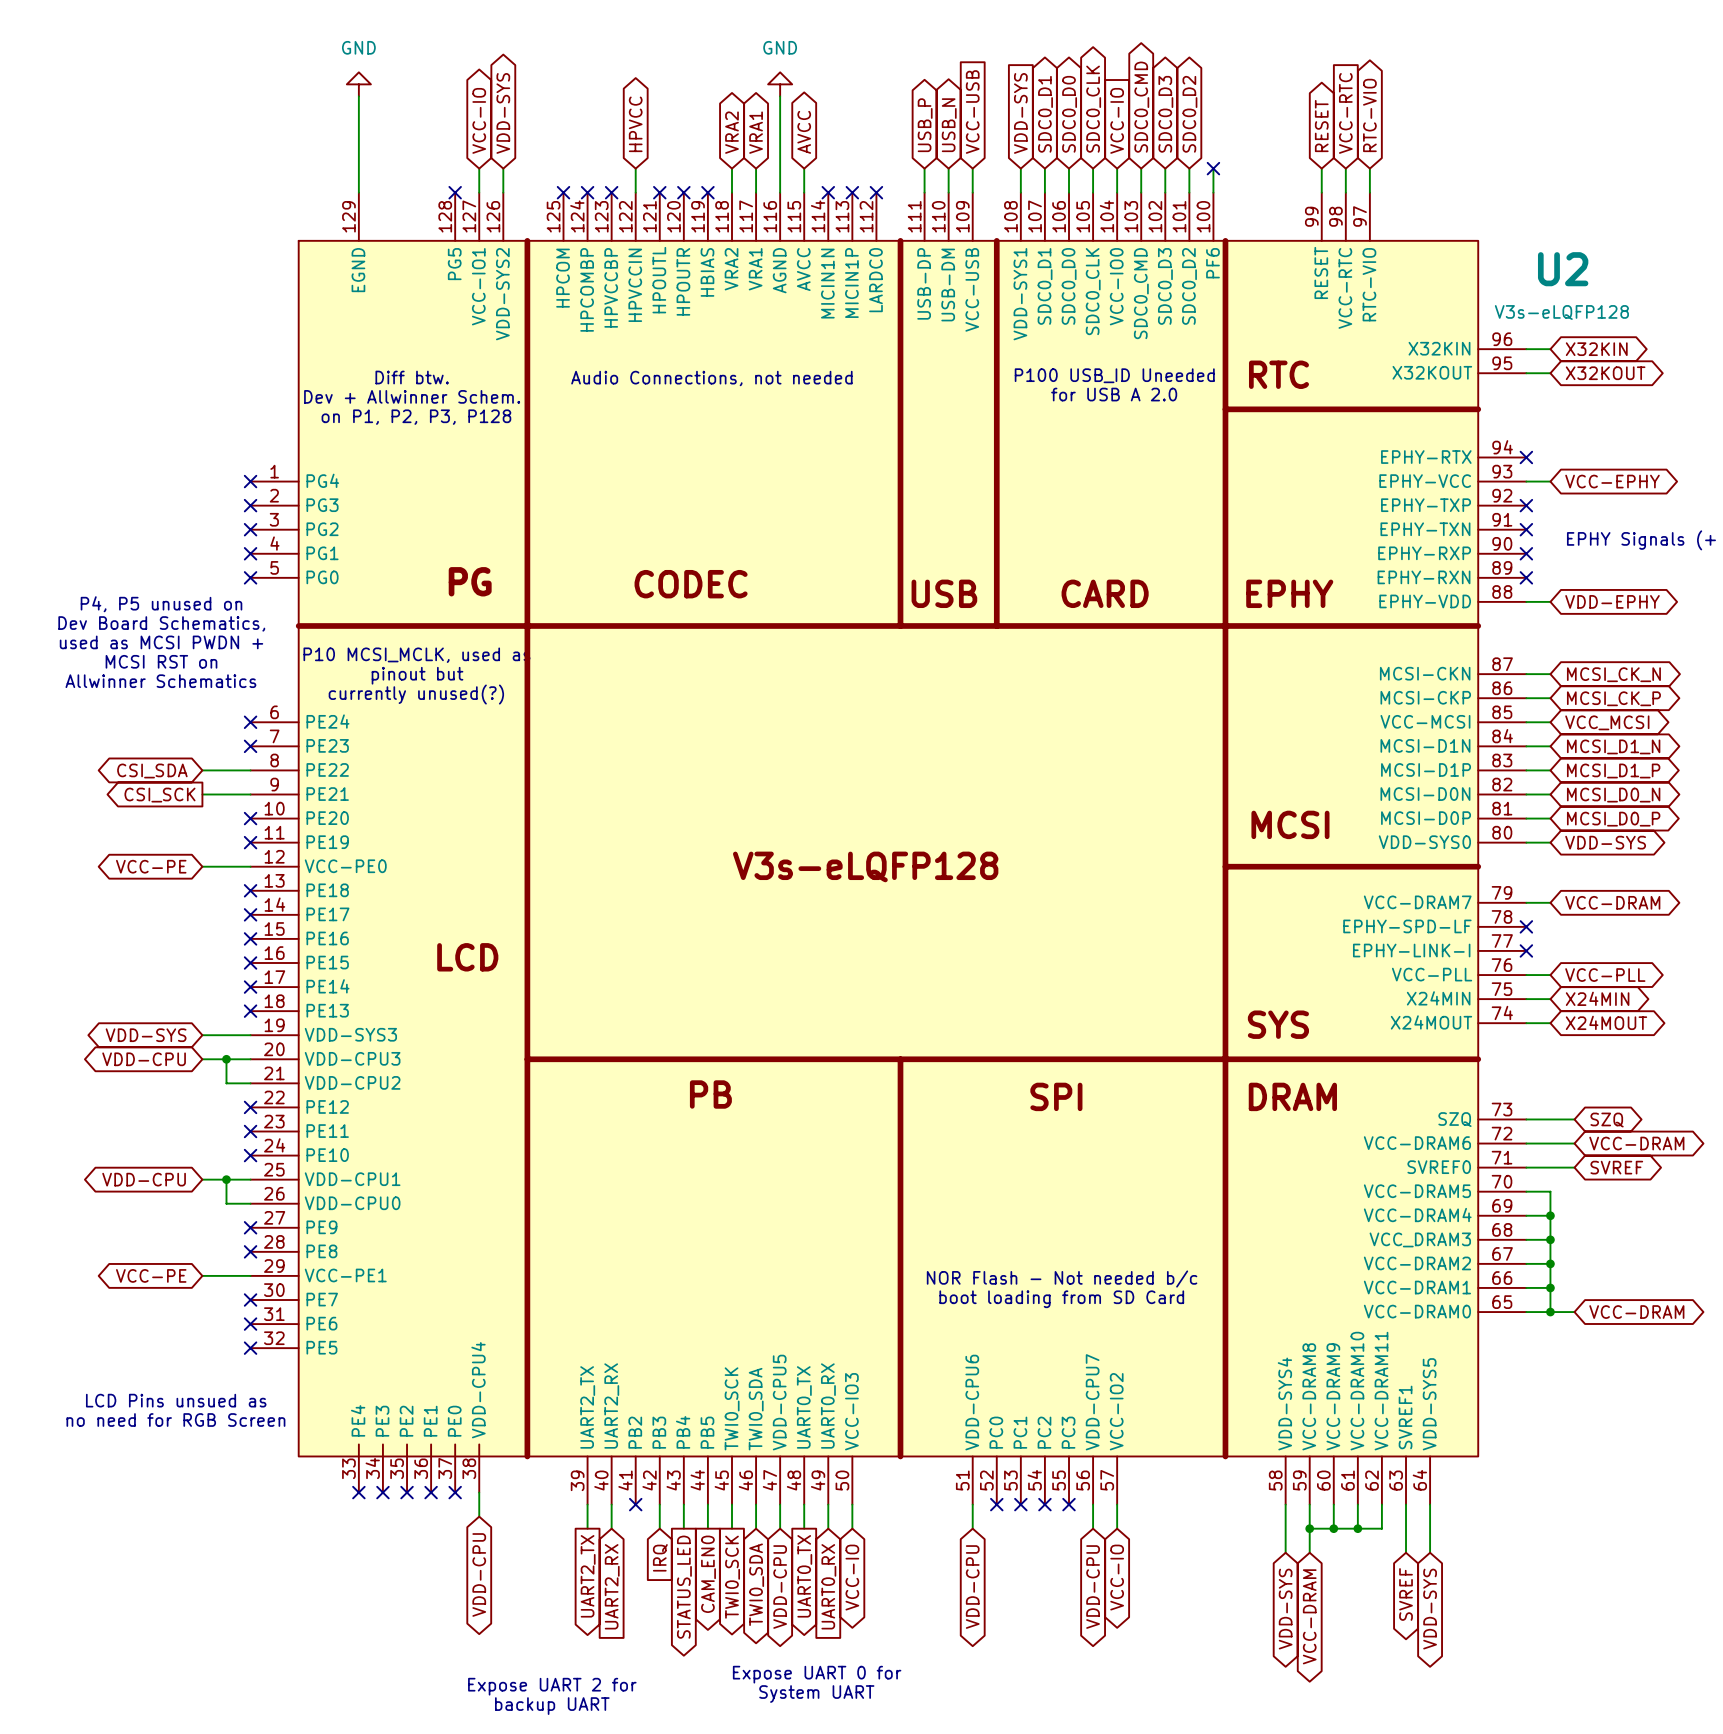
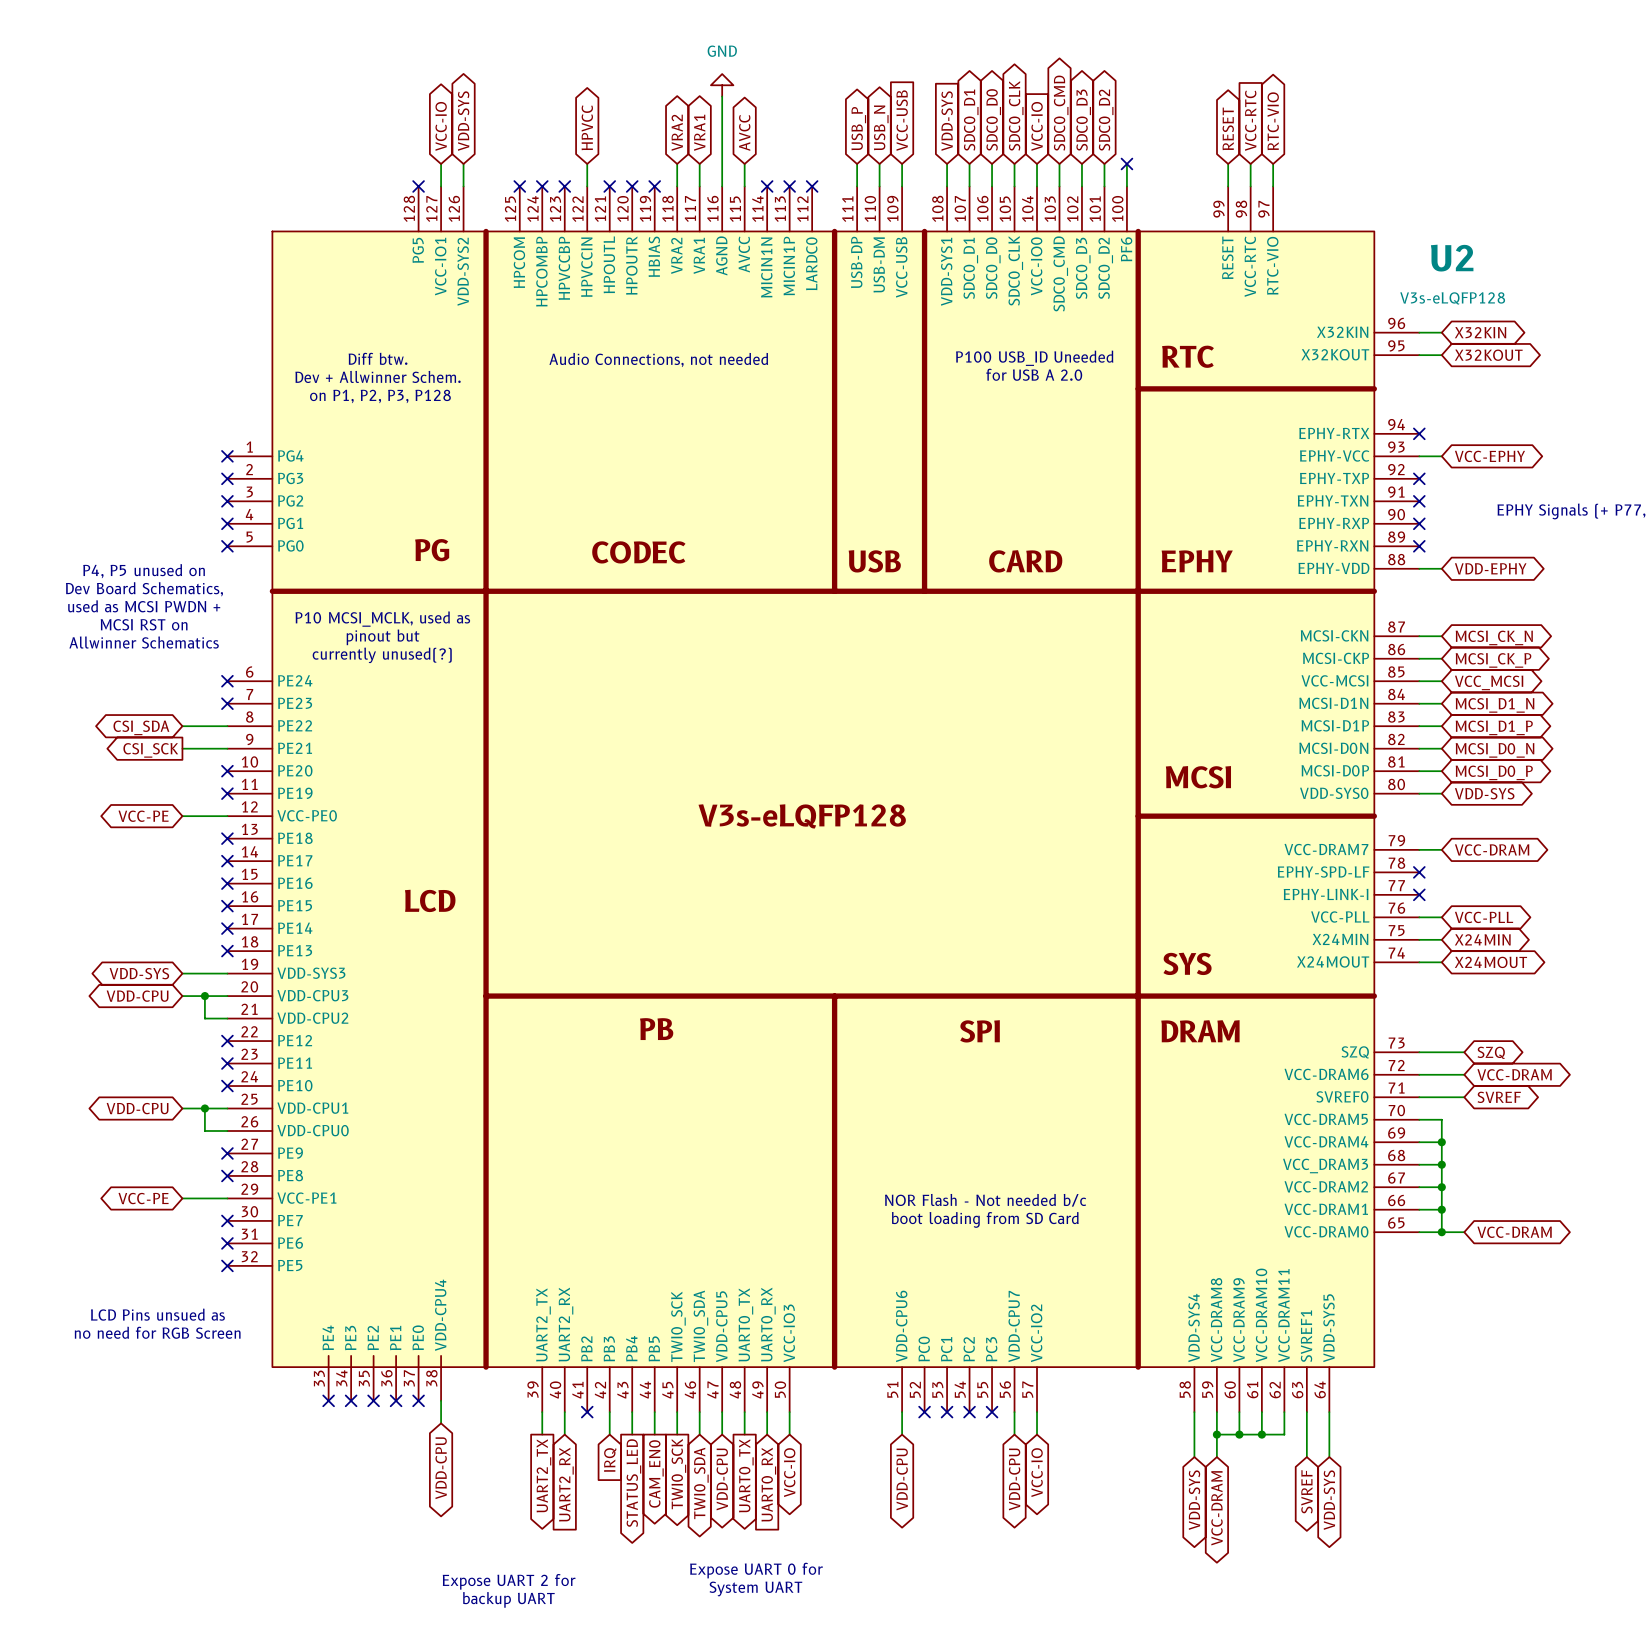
power symbol: GND (358, 84) -> none
wire: (358, 96) (358, 192) -> none
U2 symbol: [250, 192, 1527, 1505] -> [227, 186, 1420, 1413]

